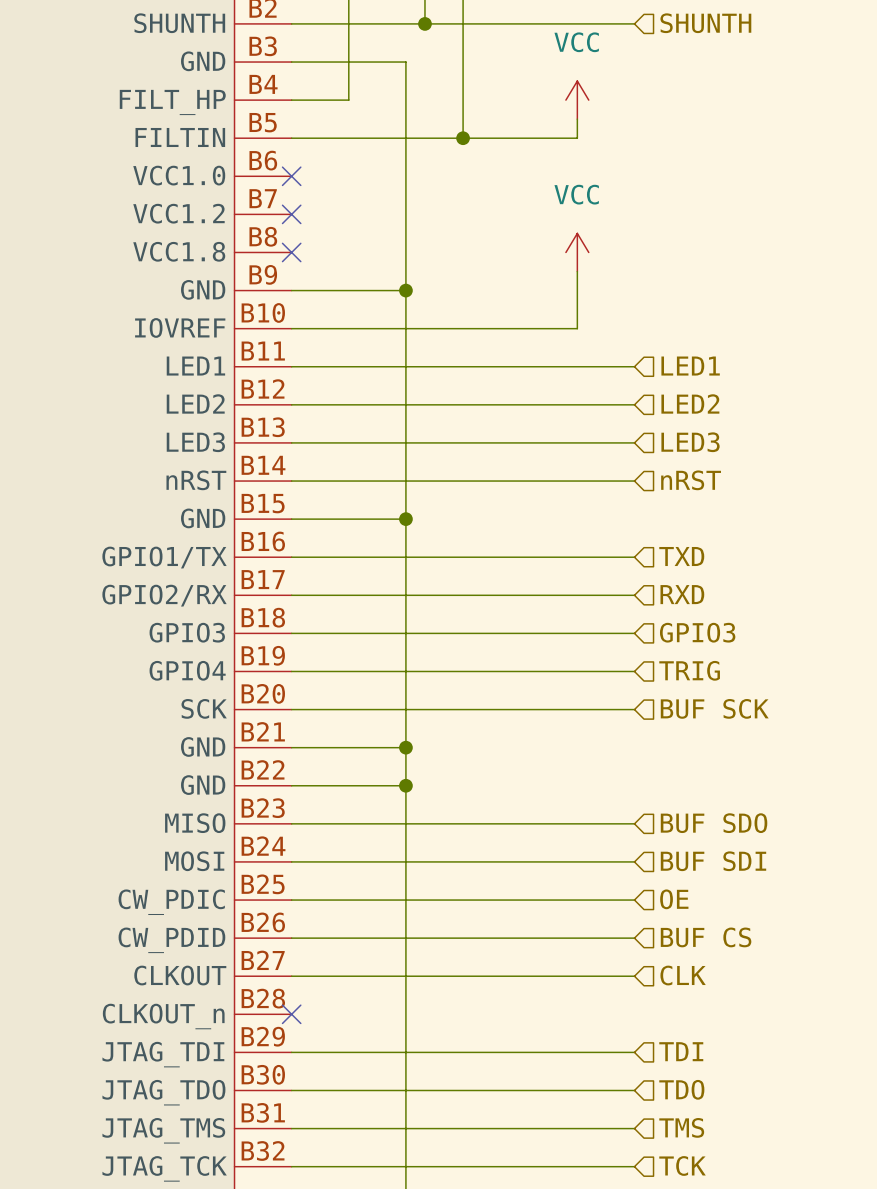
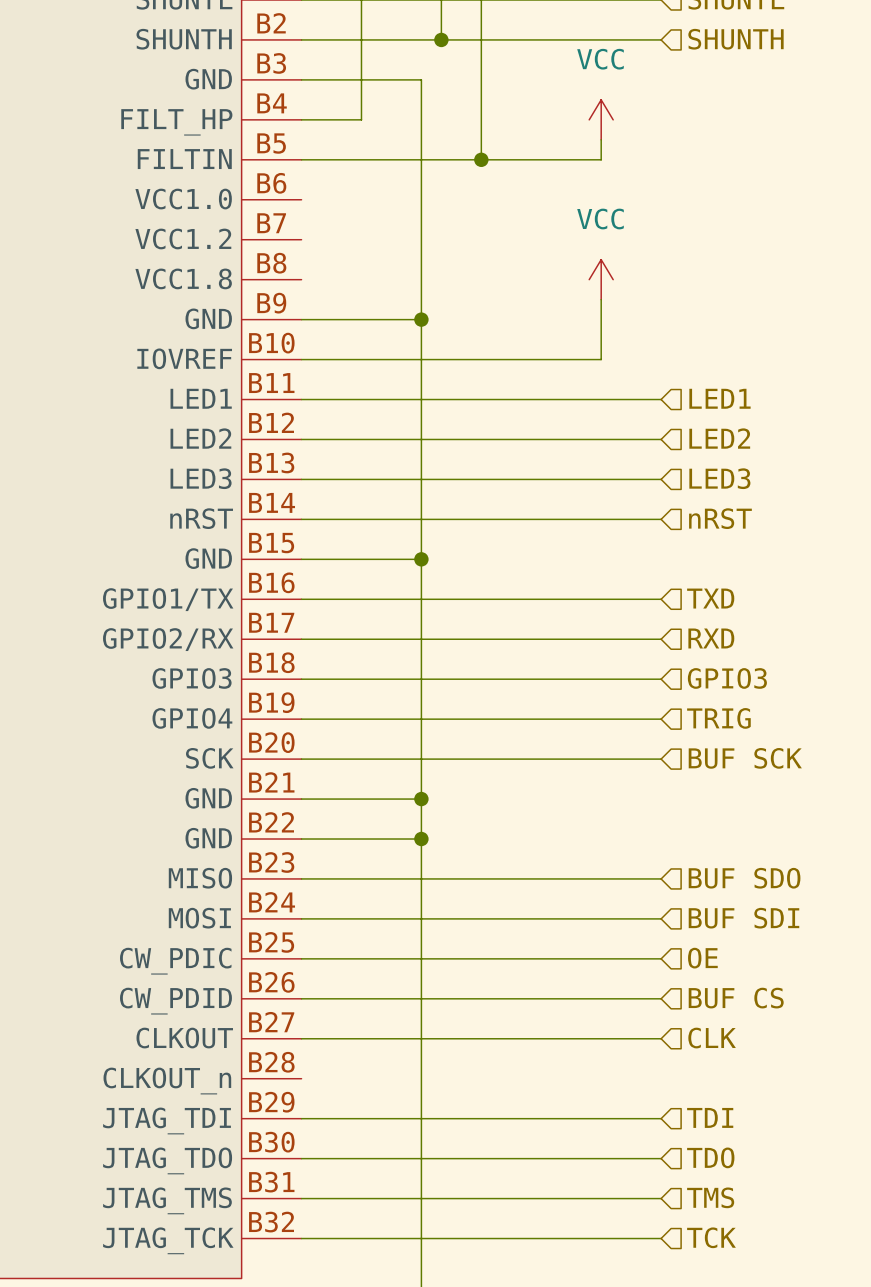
no-connect mark: (291, 176) -> none
no-connect mark: (291, 214) -> none
no-connect mark: (291, 252) -> none
no-connect mark: (291, 1014) -> none

